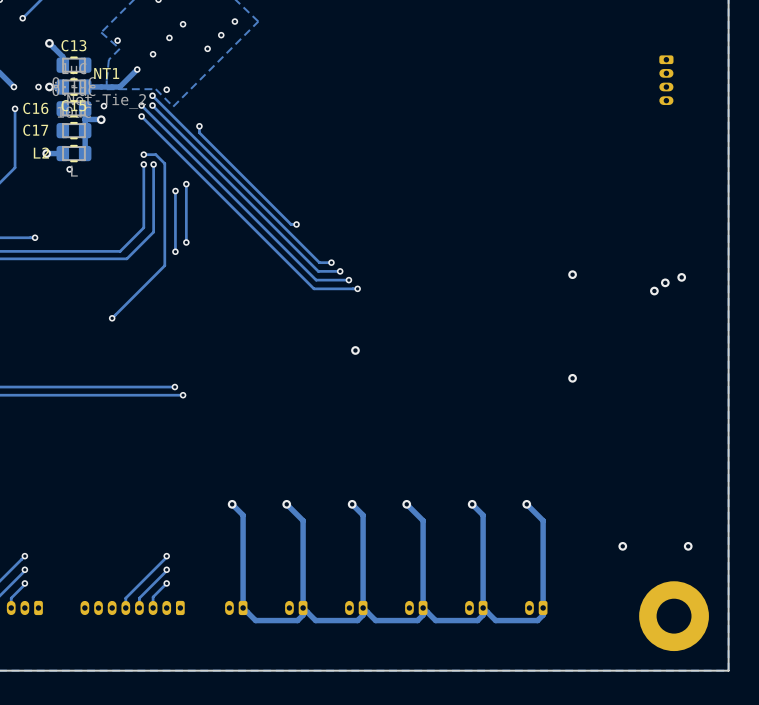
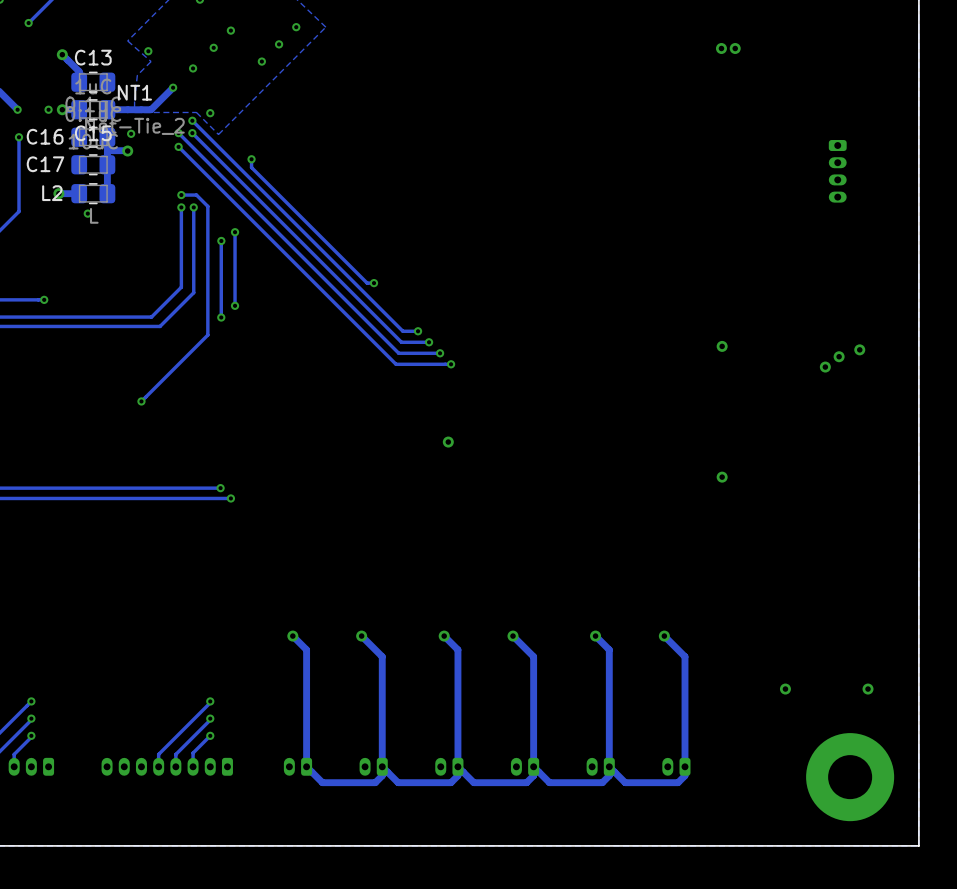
via: none -> (721, 48)
via: none -> (735, 48)
part position: (666, 80) -> (837, 171)

